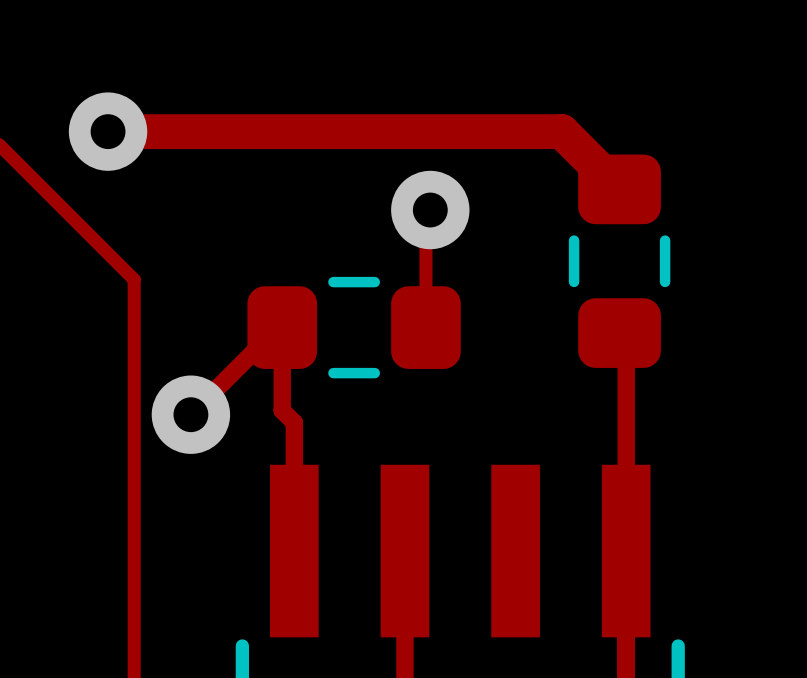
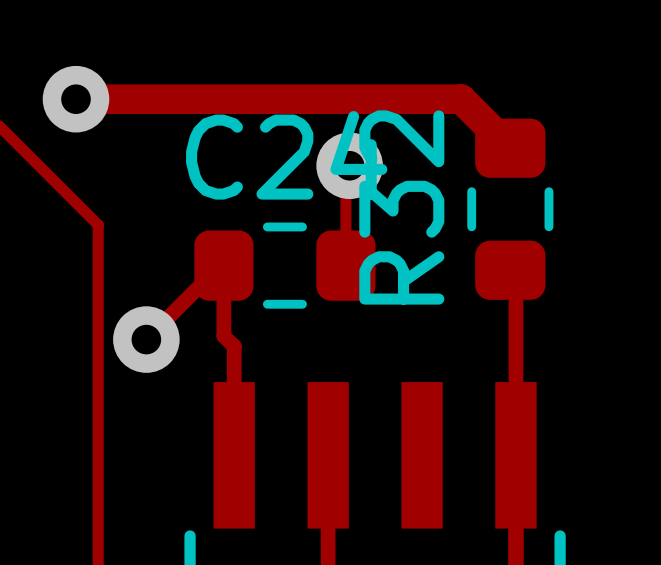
C24 name: none -> C24 (286, 155)
R32 name: none -> R32 (401, 207)

